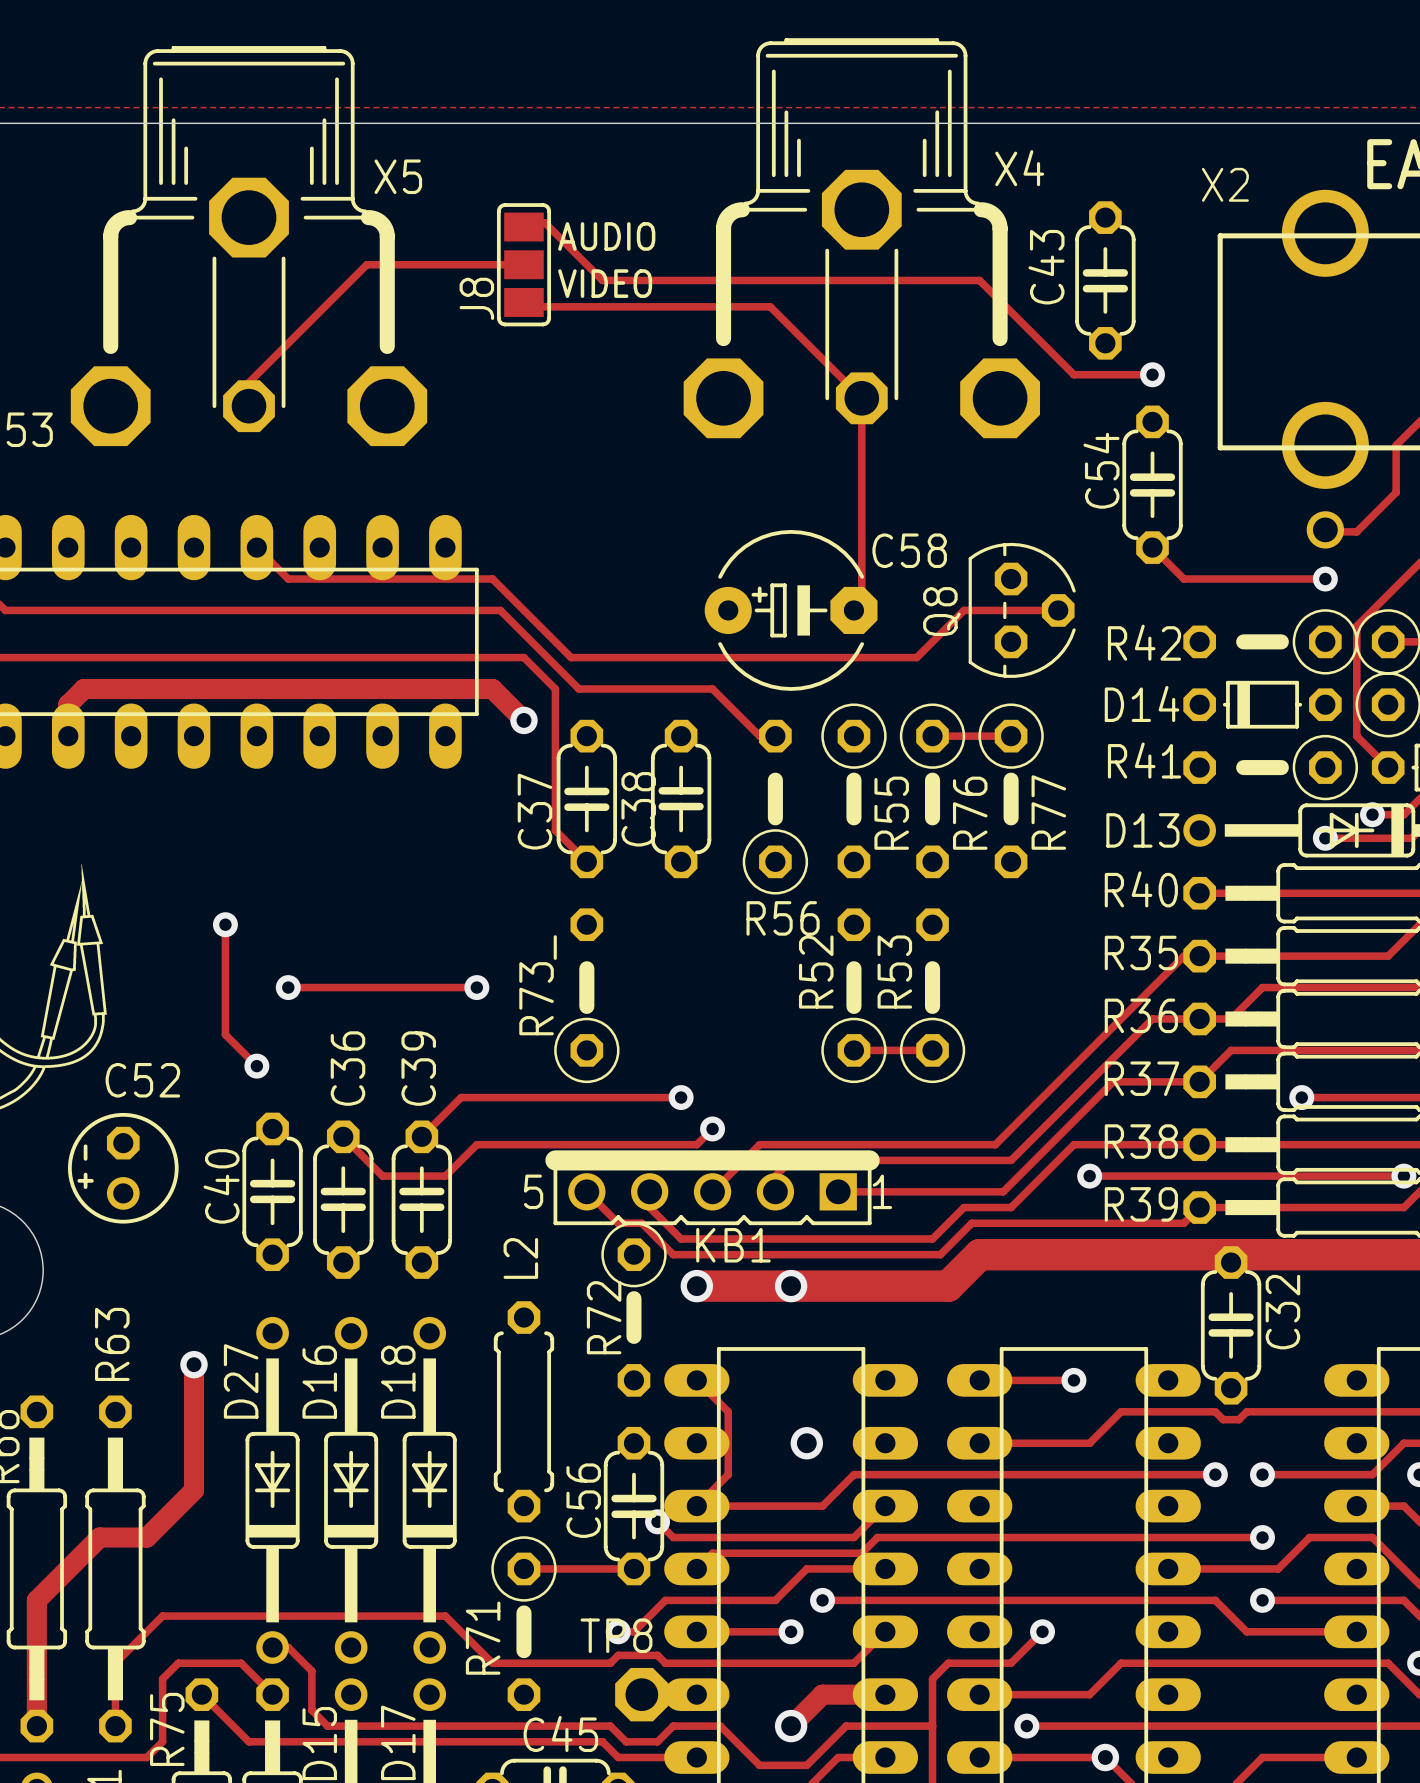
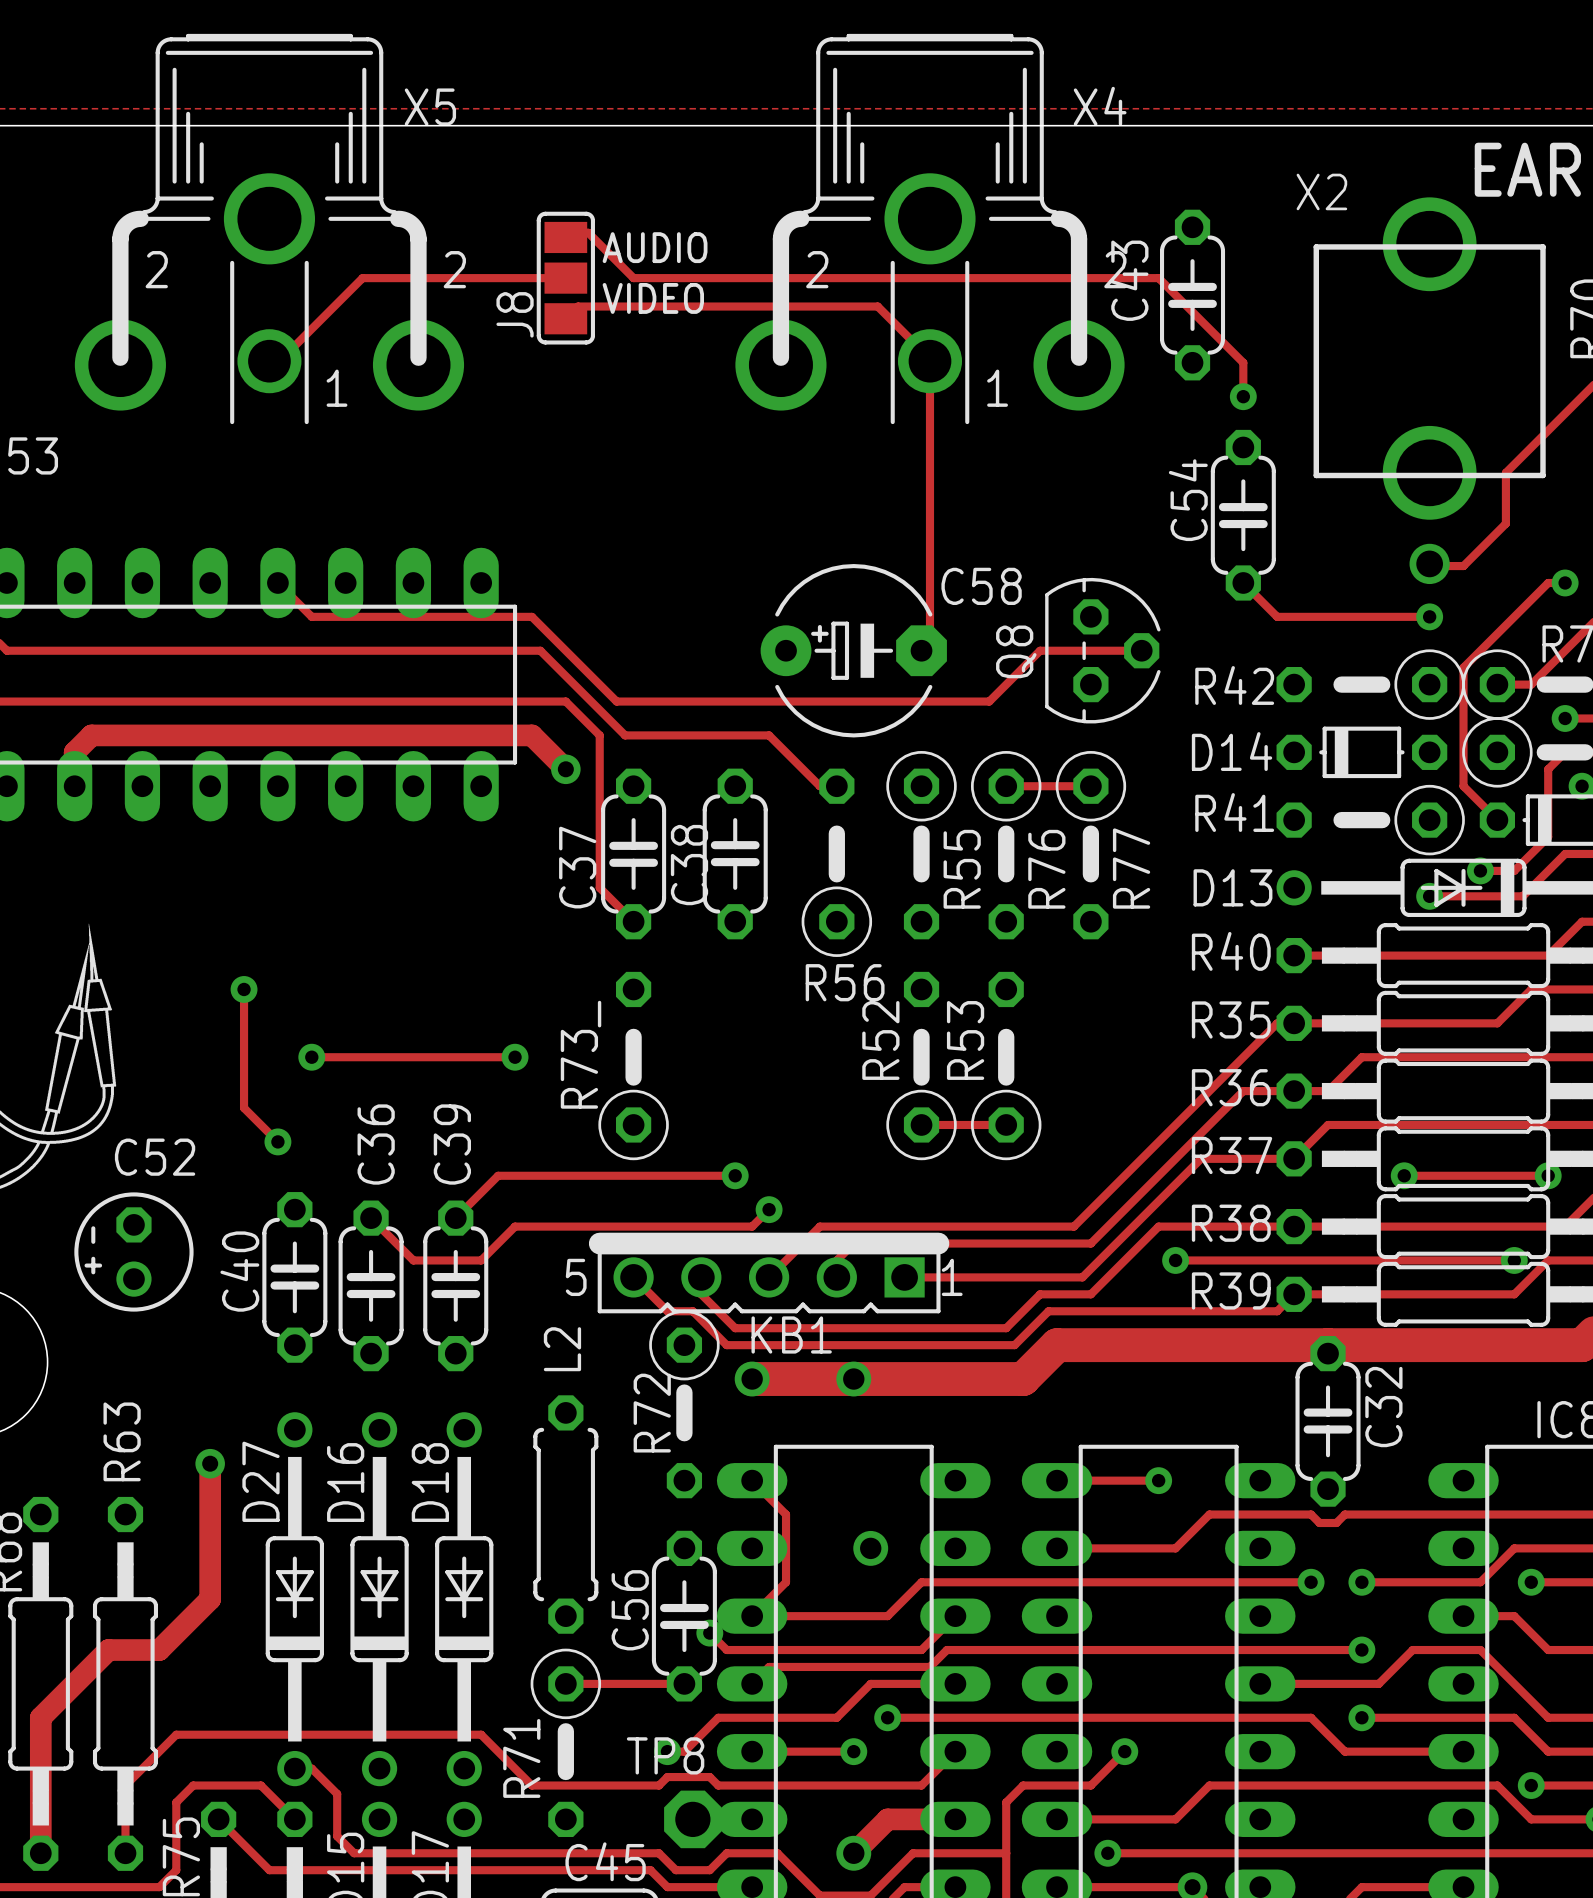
X4 footprint: [683, 38, 1041, 439] -> [735, 33, 1125, 425]
X5 footprint: [70, 46, 428, 447] -> [74, 33, 465, 425]
track: (366, 264) (249, 382) (249, 406) -> (396, 278) (362, 278) (279, 361) (269, 361)
track: (586, 264) (602, 280) (979, 280) (1073, 374) (1152, 374) -> (633, 278) (1158, 278) (1243, 362) (1243, 396)
track: (523, 302) (528, 306) (770, 306) (861, 398) -> (565, 318) (578, 306) (877, 306) (929, 358) (929, 422)

